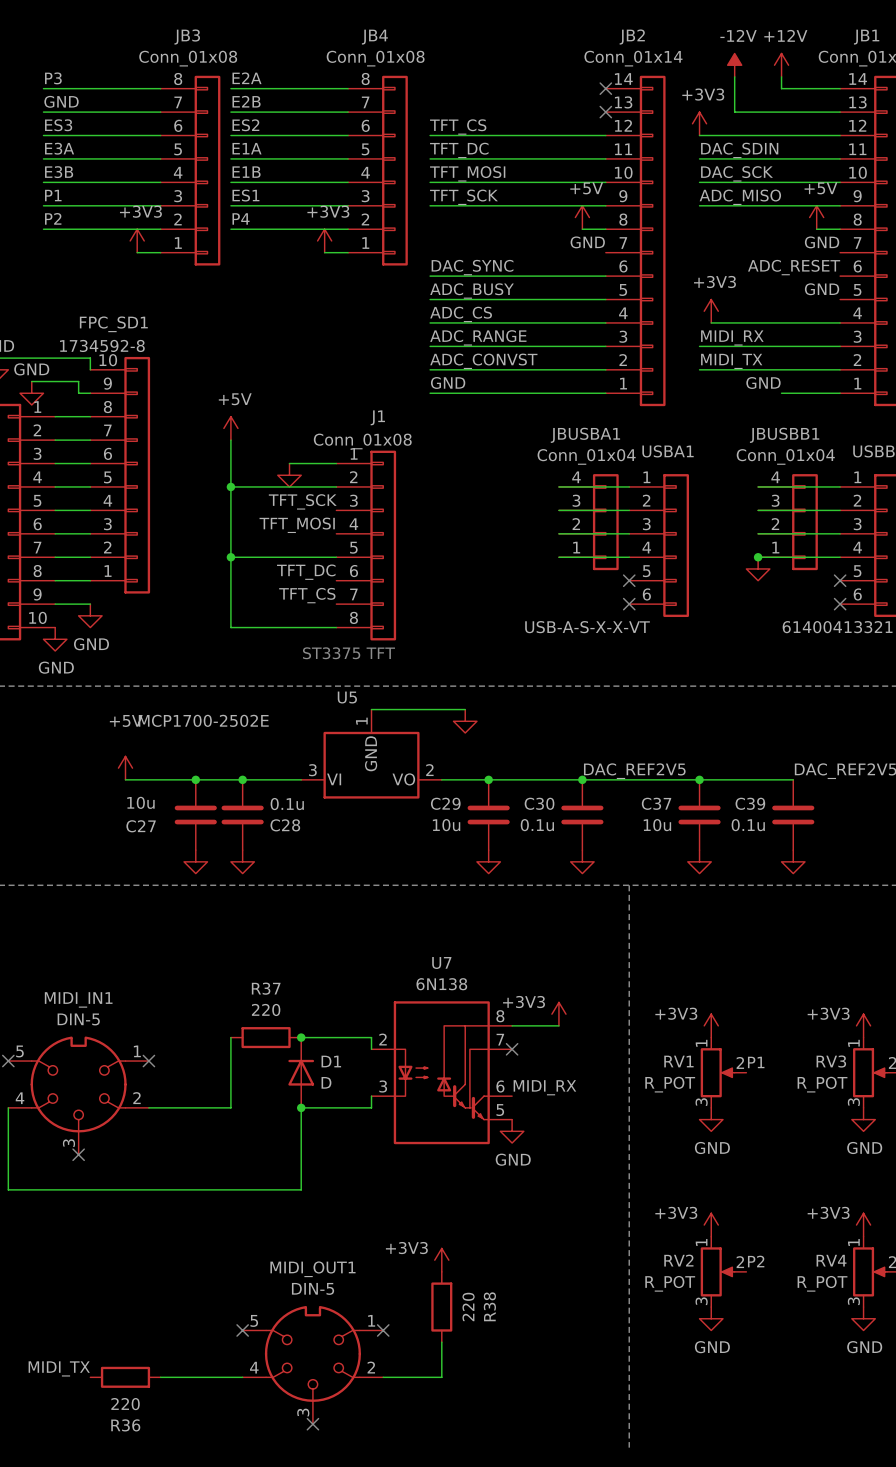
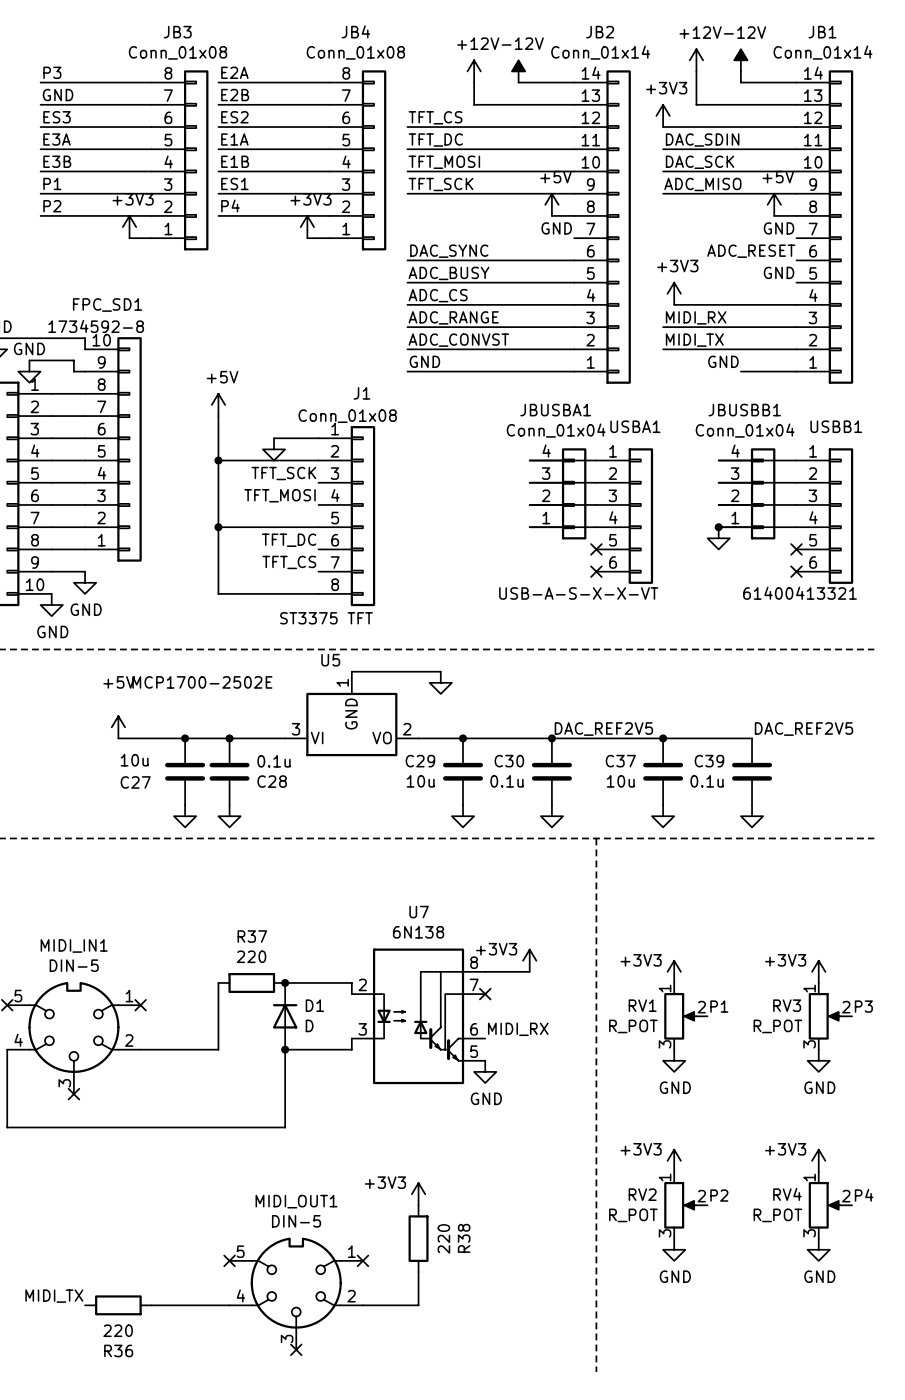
power symbol: -12V (734, 65) -> +12V (696, 60)
power symbol: +12V (781, 65) -> -12V (740, 60)
power symbol: none -> +12V (474, 71)
power symbol: none -> -12V (518, 71)
wire: none -> (474, 82) (474, 104) (574, 104)
wire: none -> (518, 82) (574, 82)
no-connect mark: (605, 88) -> none
no-connect mark: (605, 112) -> none

